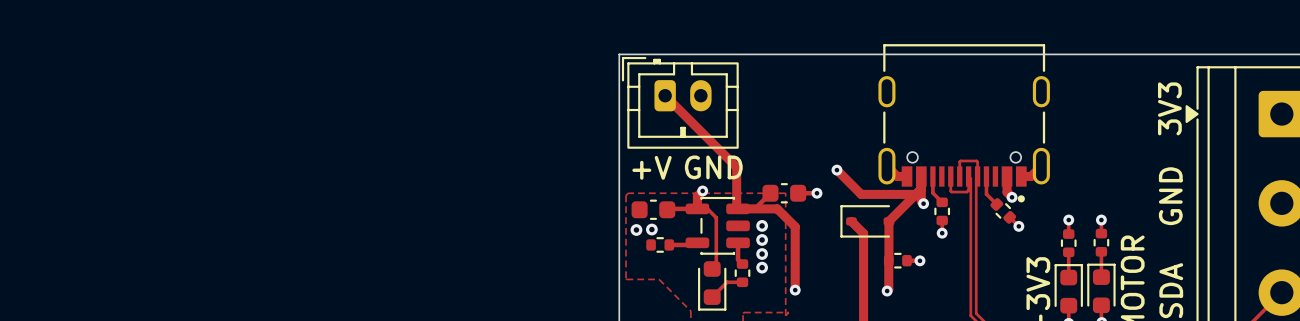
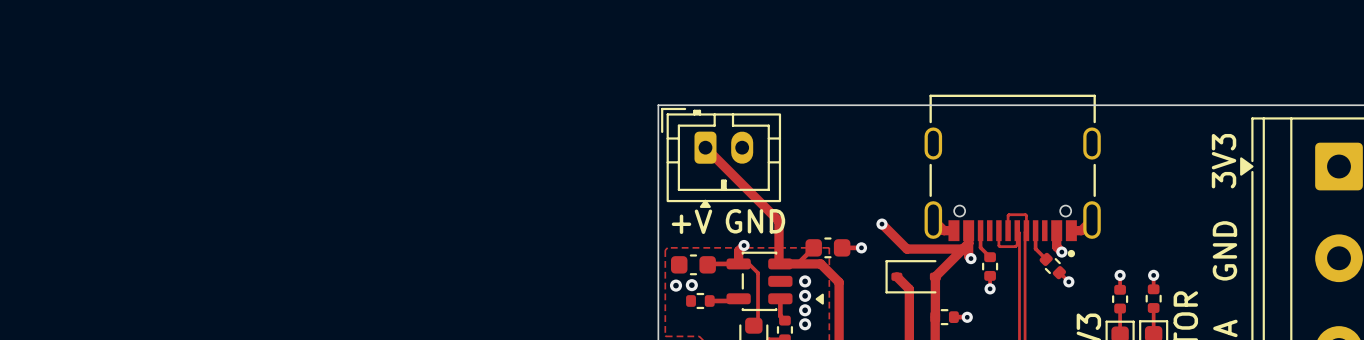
drawing: none -> [699, 199, 711, 208]
drawing: none -> [815, 293, 824, 305]

